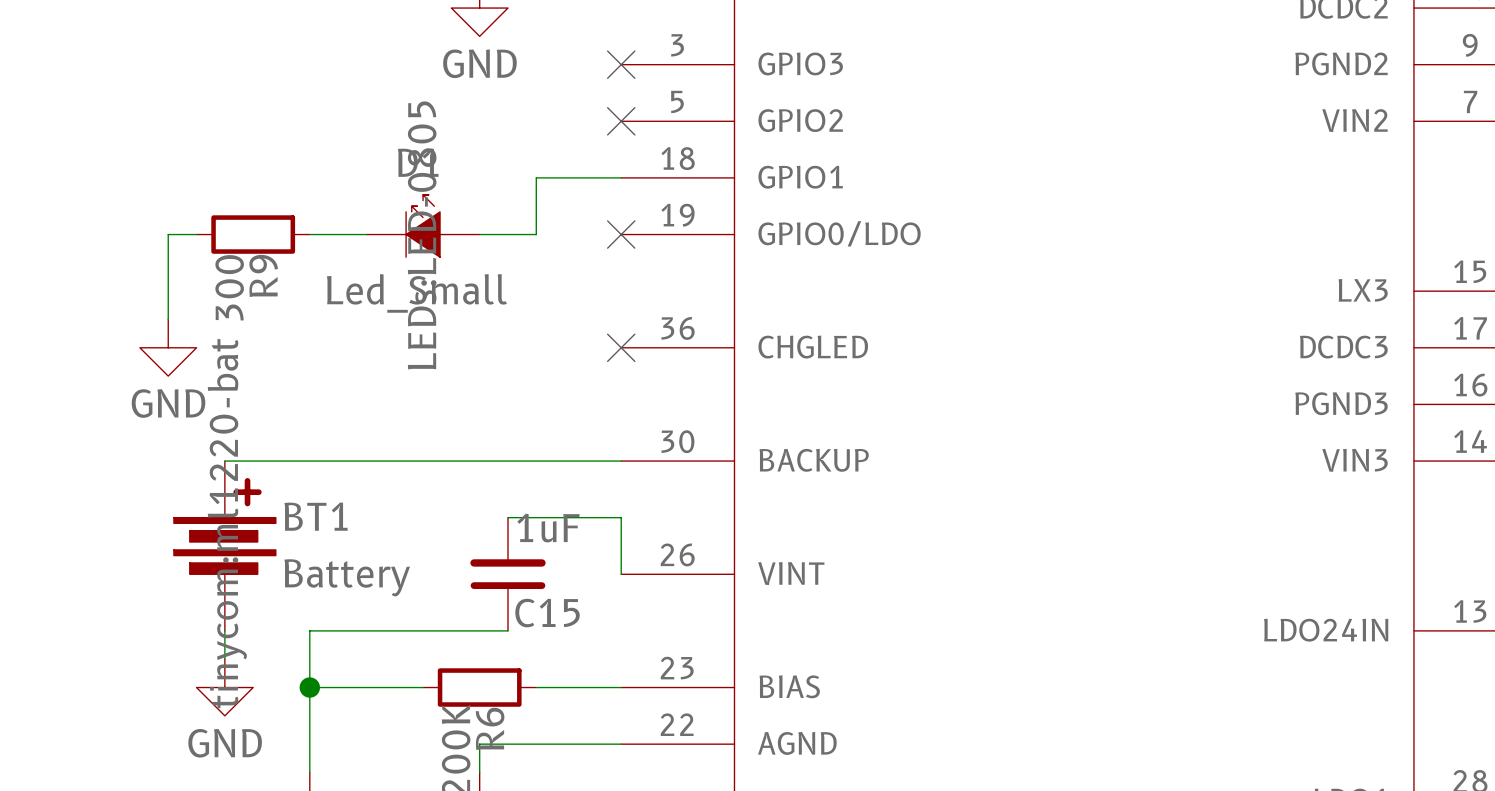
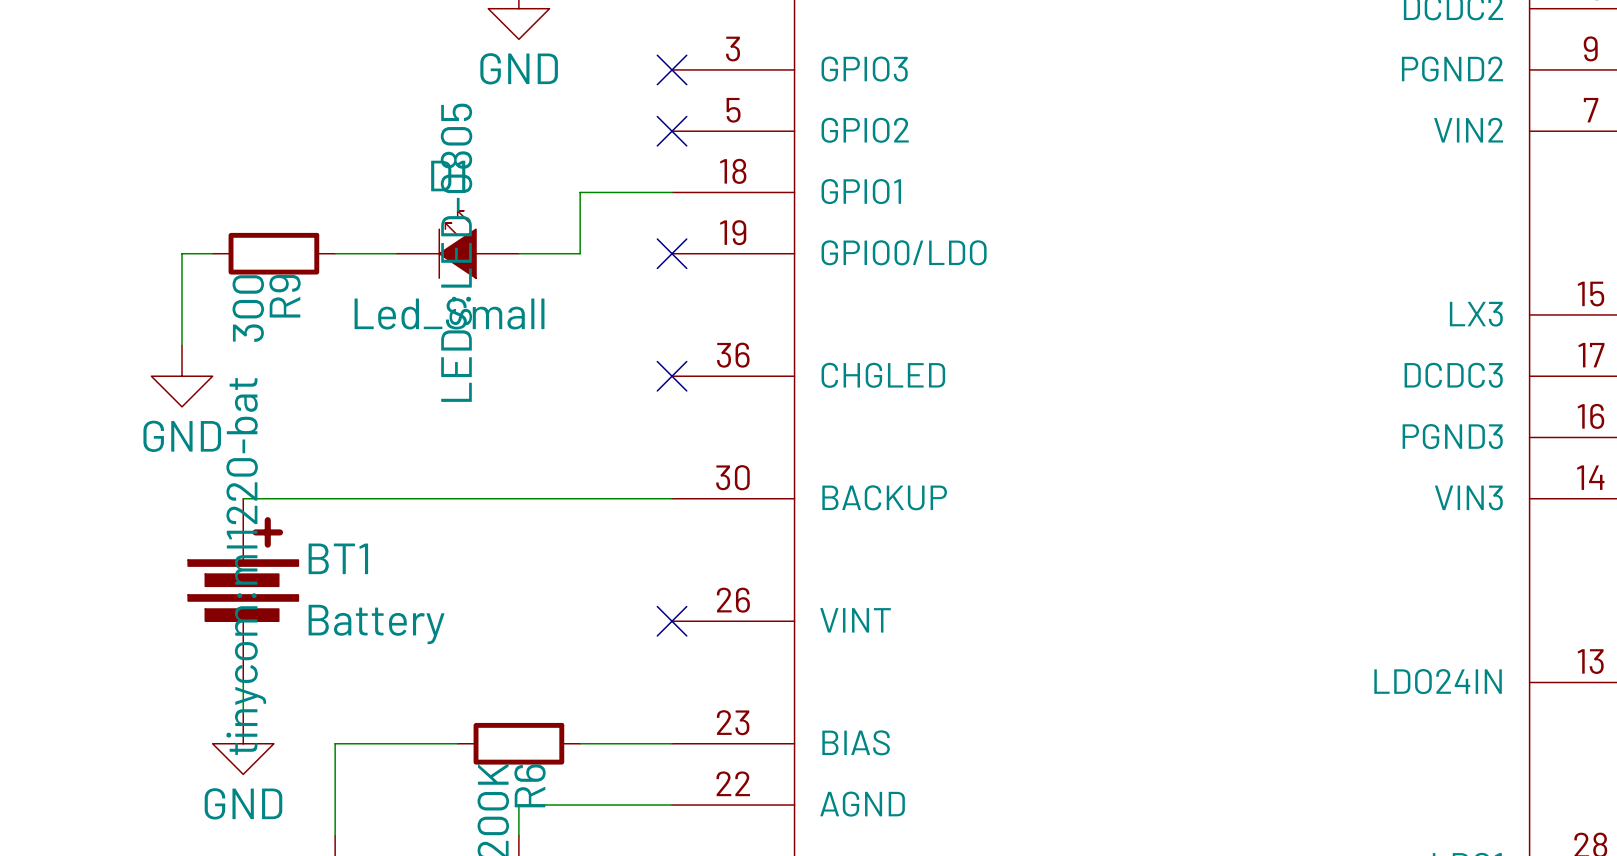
wire: (507, 517) (621, 517) (621, 574) -> none
C15: 1uF (507, 574) -> none
no-connect mark: none -> (672, 621)
wire: (507, 630) (309, 630) (309, 687) -> none
junction: (309, 687) -> none

